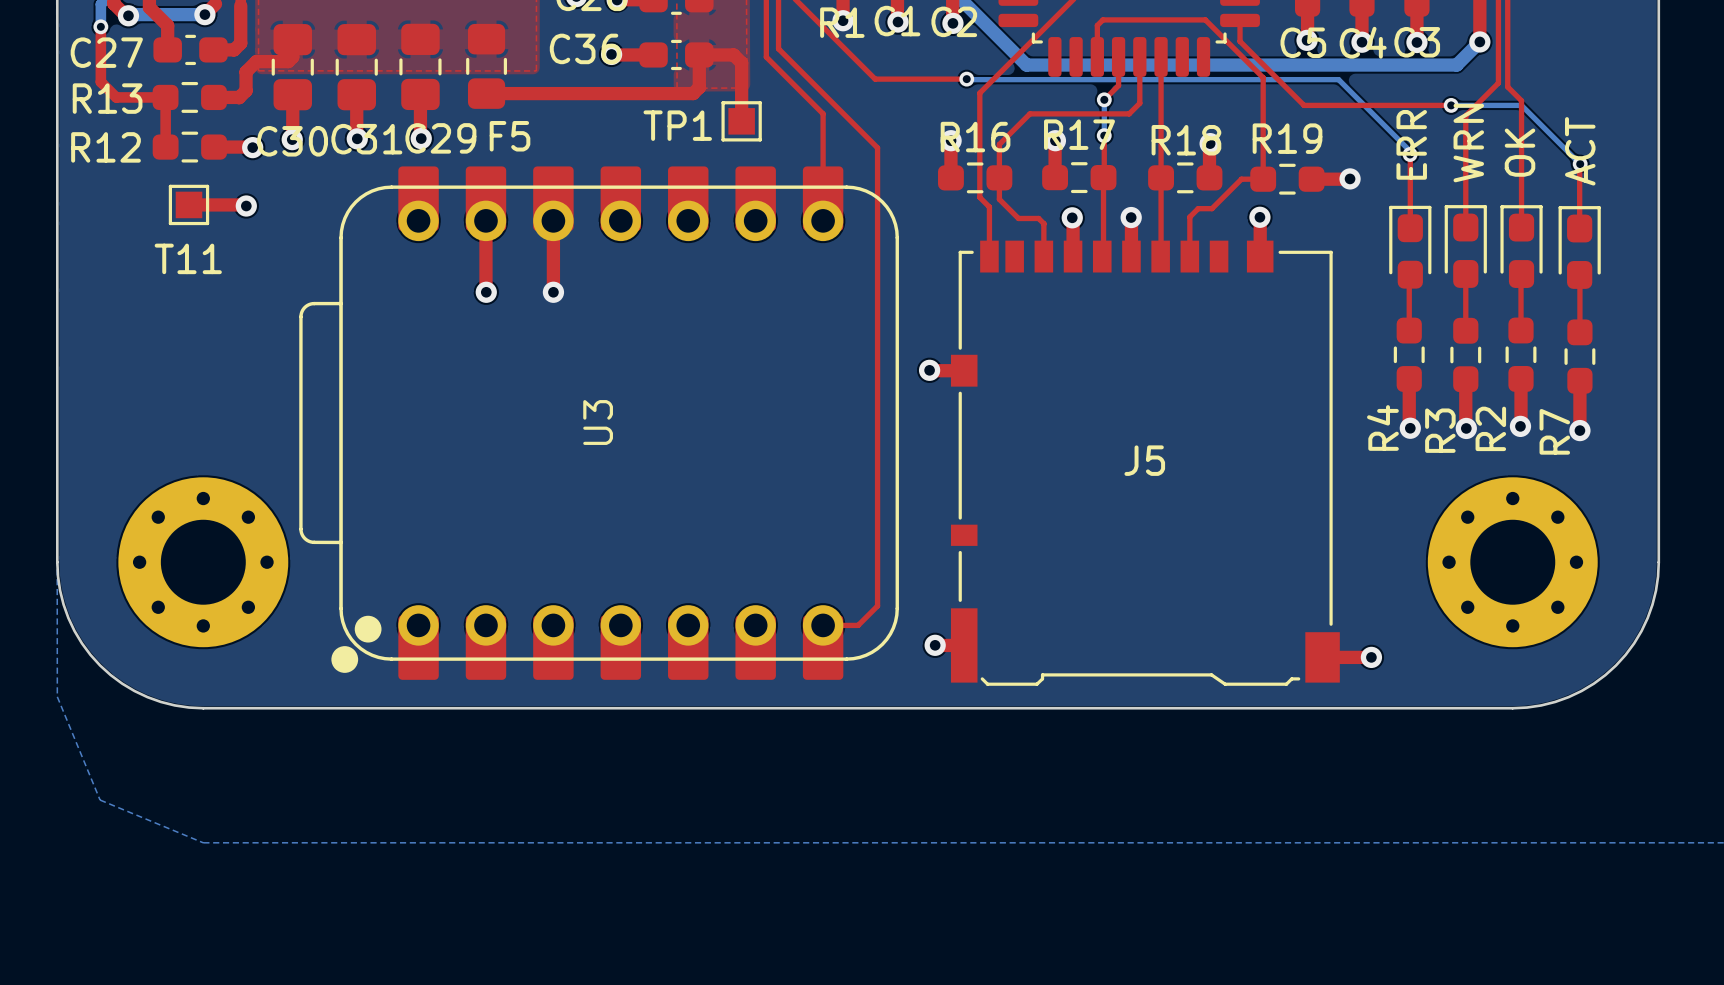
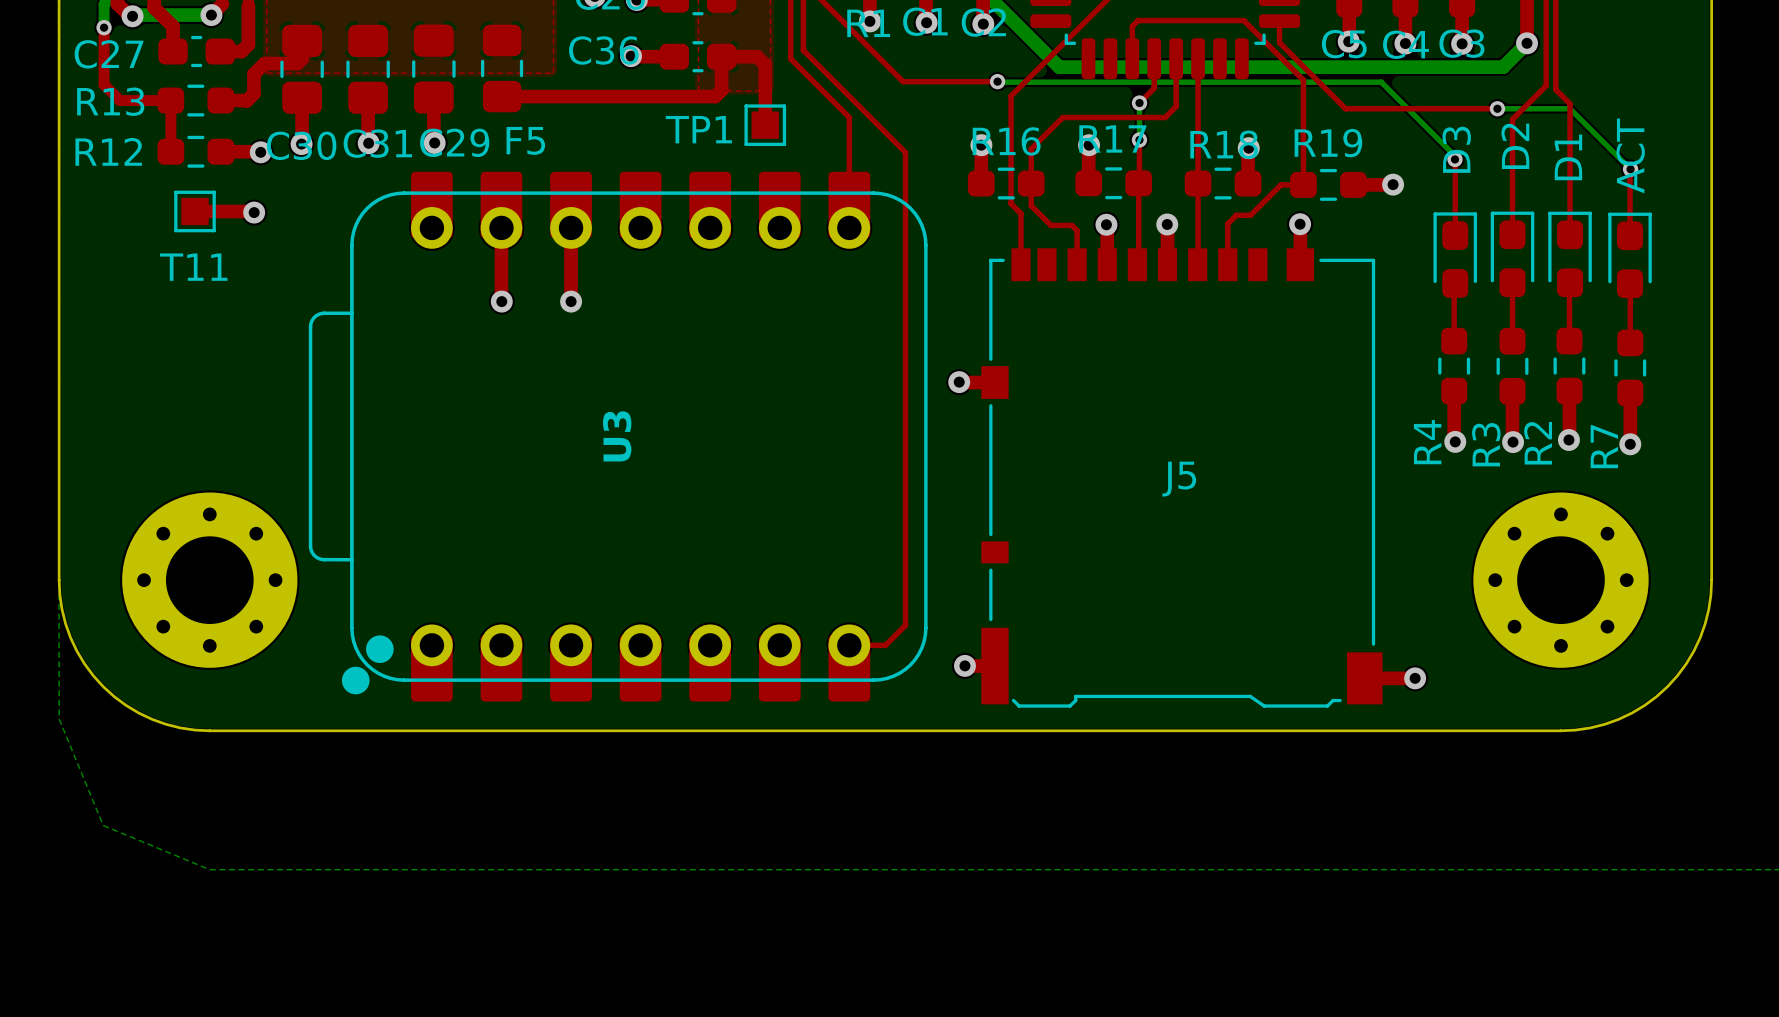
WRN name: WRN (1468, 143) -> D2 (1515, 146)
ERR name: ERR (1411, 144) -> D3 (1456, 149)
OK name: OK (1520, 152) -> D1 (1568, 157)

